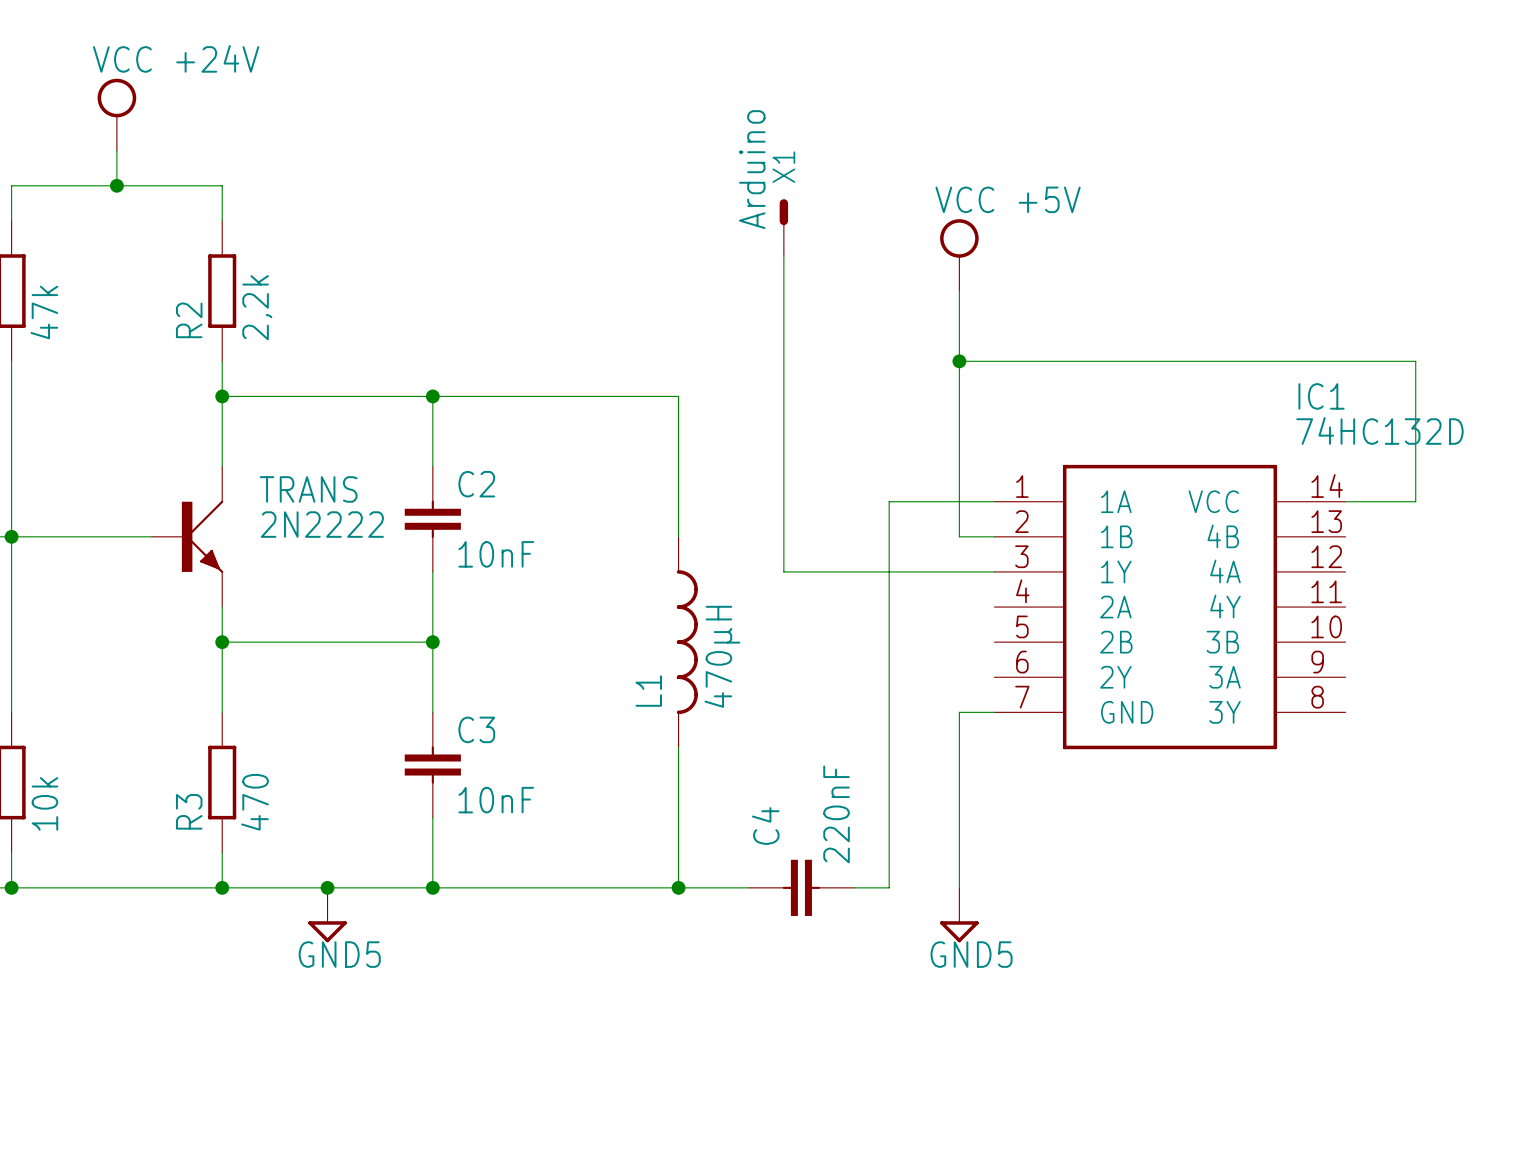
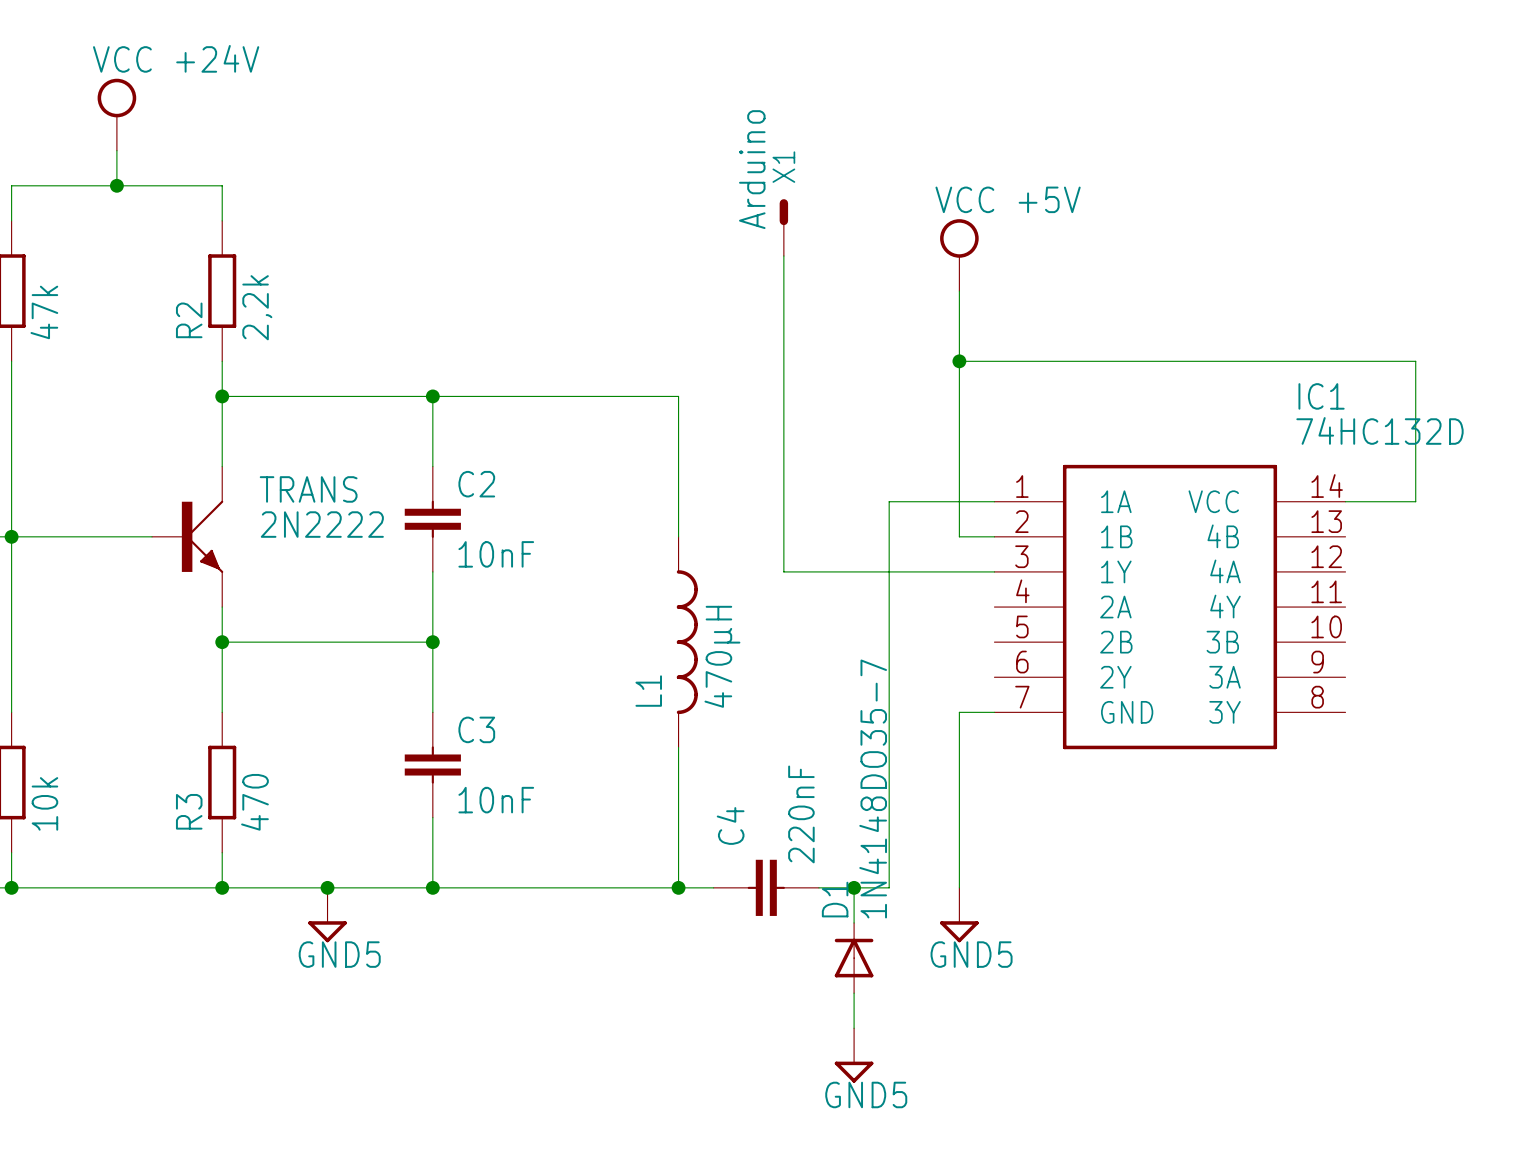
C4 position: (801, 887) -> (766, 887)
wire: none -> (818, 887) (854, 887) (854, 922)
junction: none -> (854, 887)
D1: none -> 1N4148DO35-7 (854, 958)
wire: none -> (854, 993) (854, 1028)
power symbol: none -> GND5 (854, 1055)

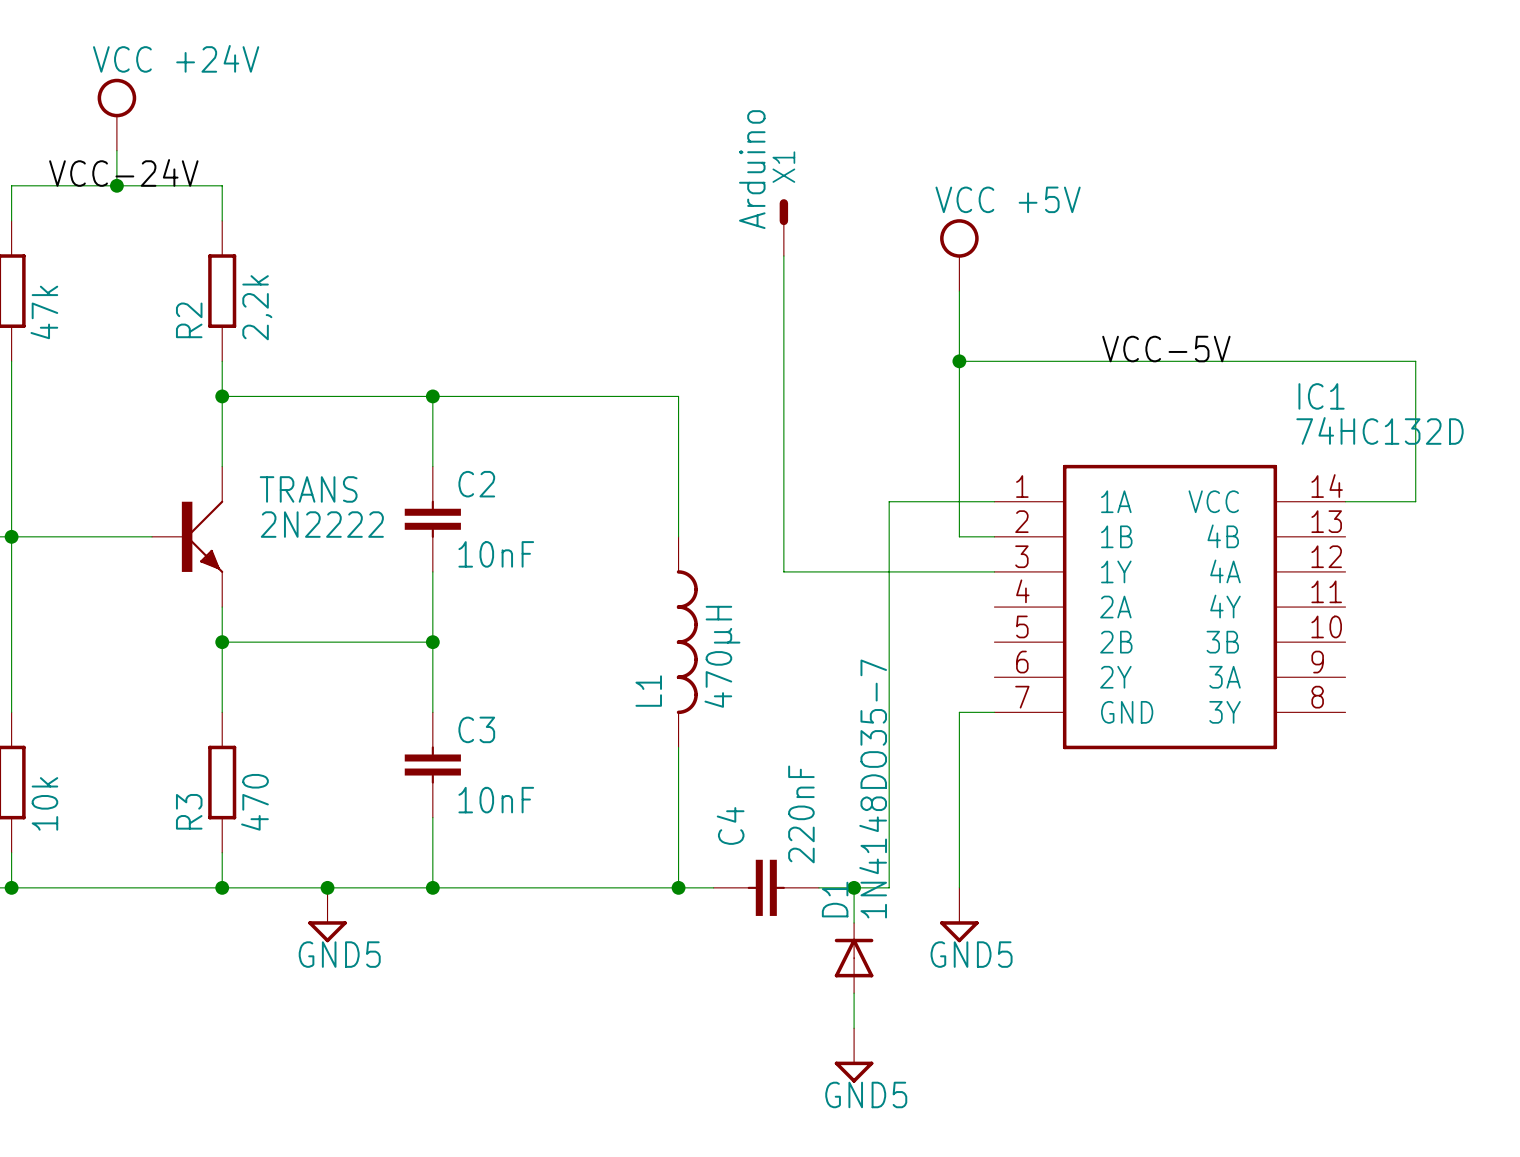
label: none -> VCC-24V (123, 172)
label: none -> VCC-5V (1166, 349)

